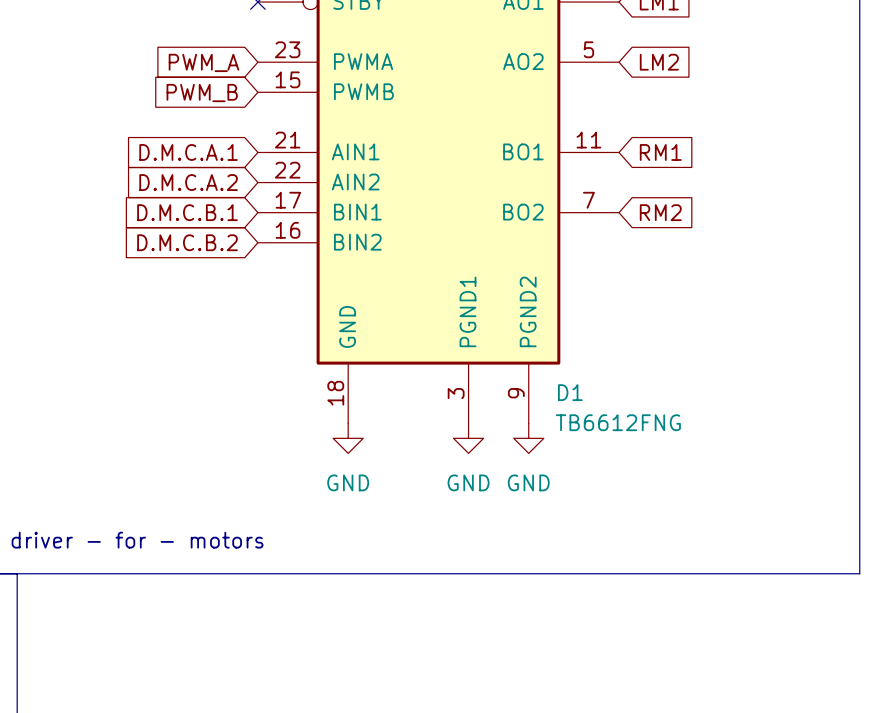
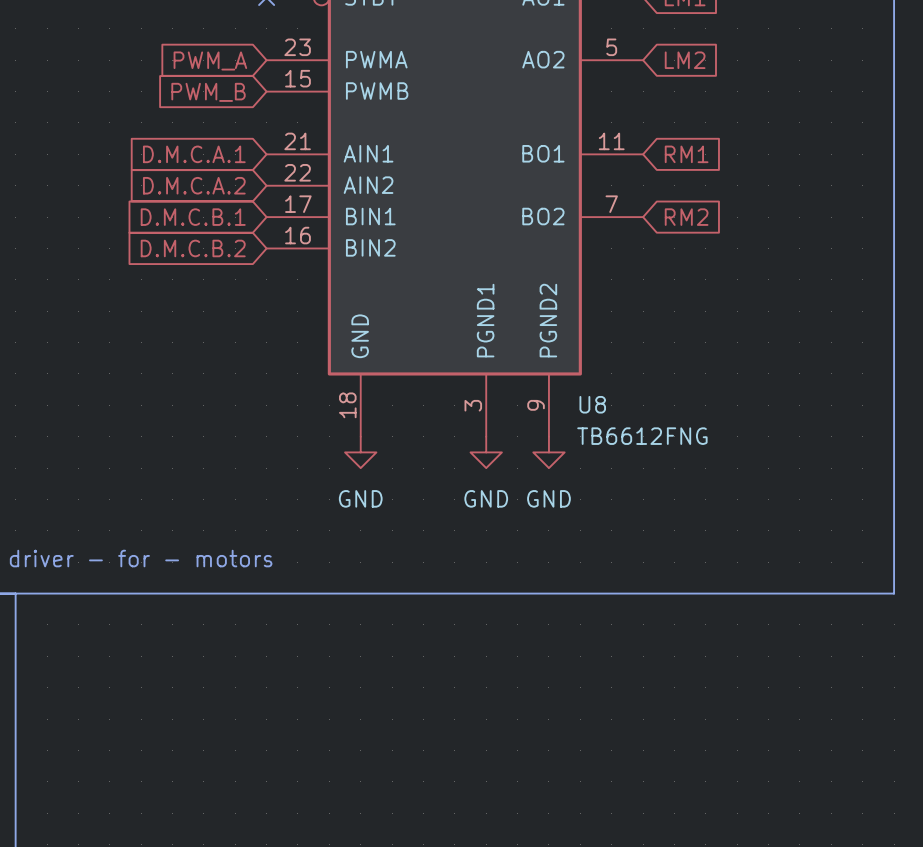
D1 name: D1 (570, 392) -> U8 (592, 404)

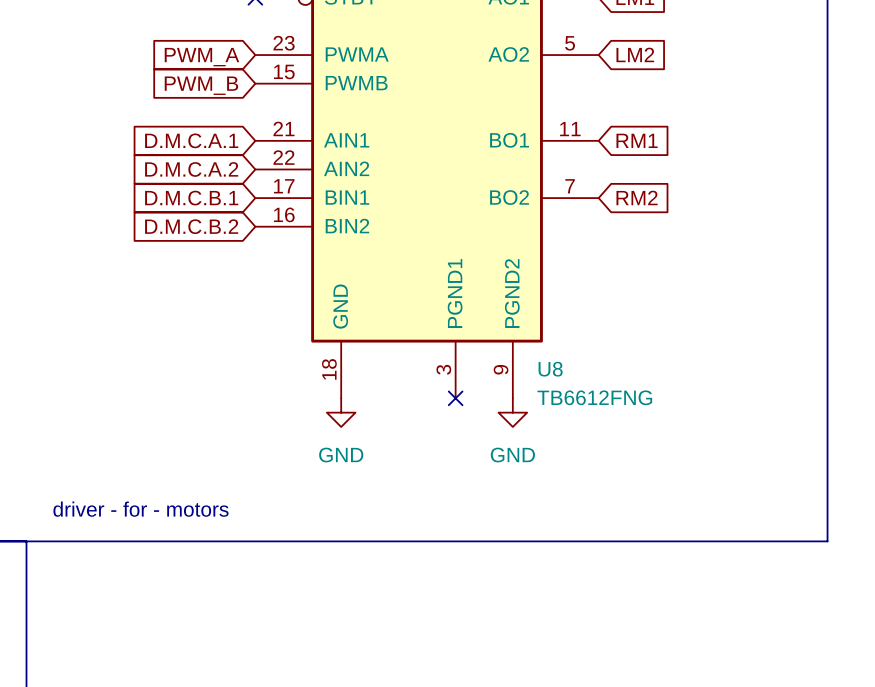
no-connect mark: none -> (455, 398)
power symbol: GND (486, 452) -> none

